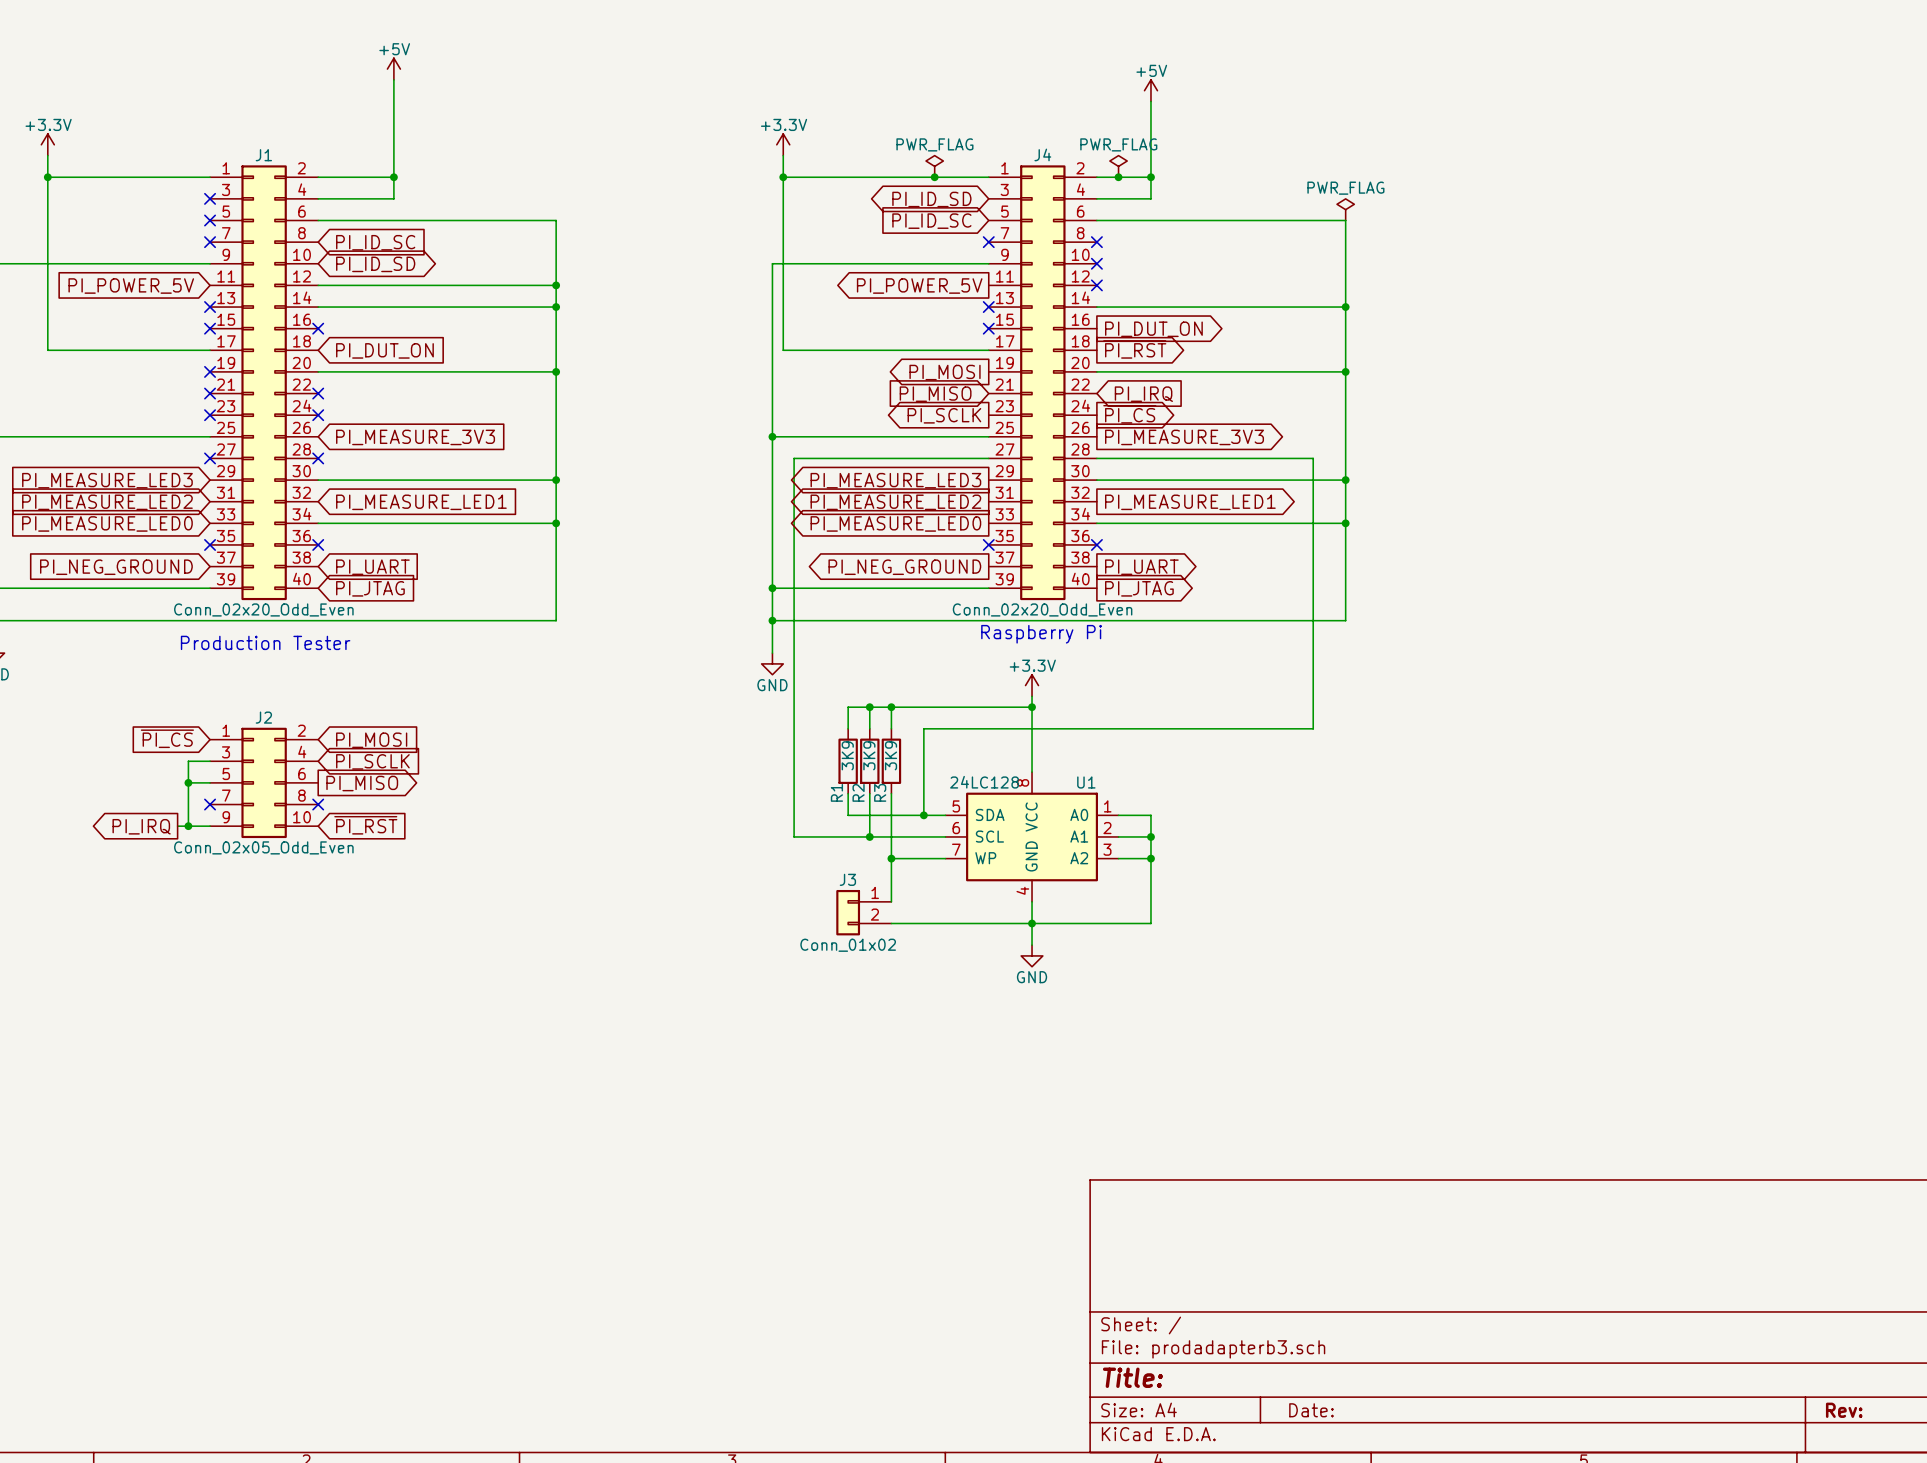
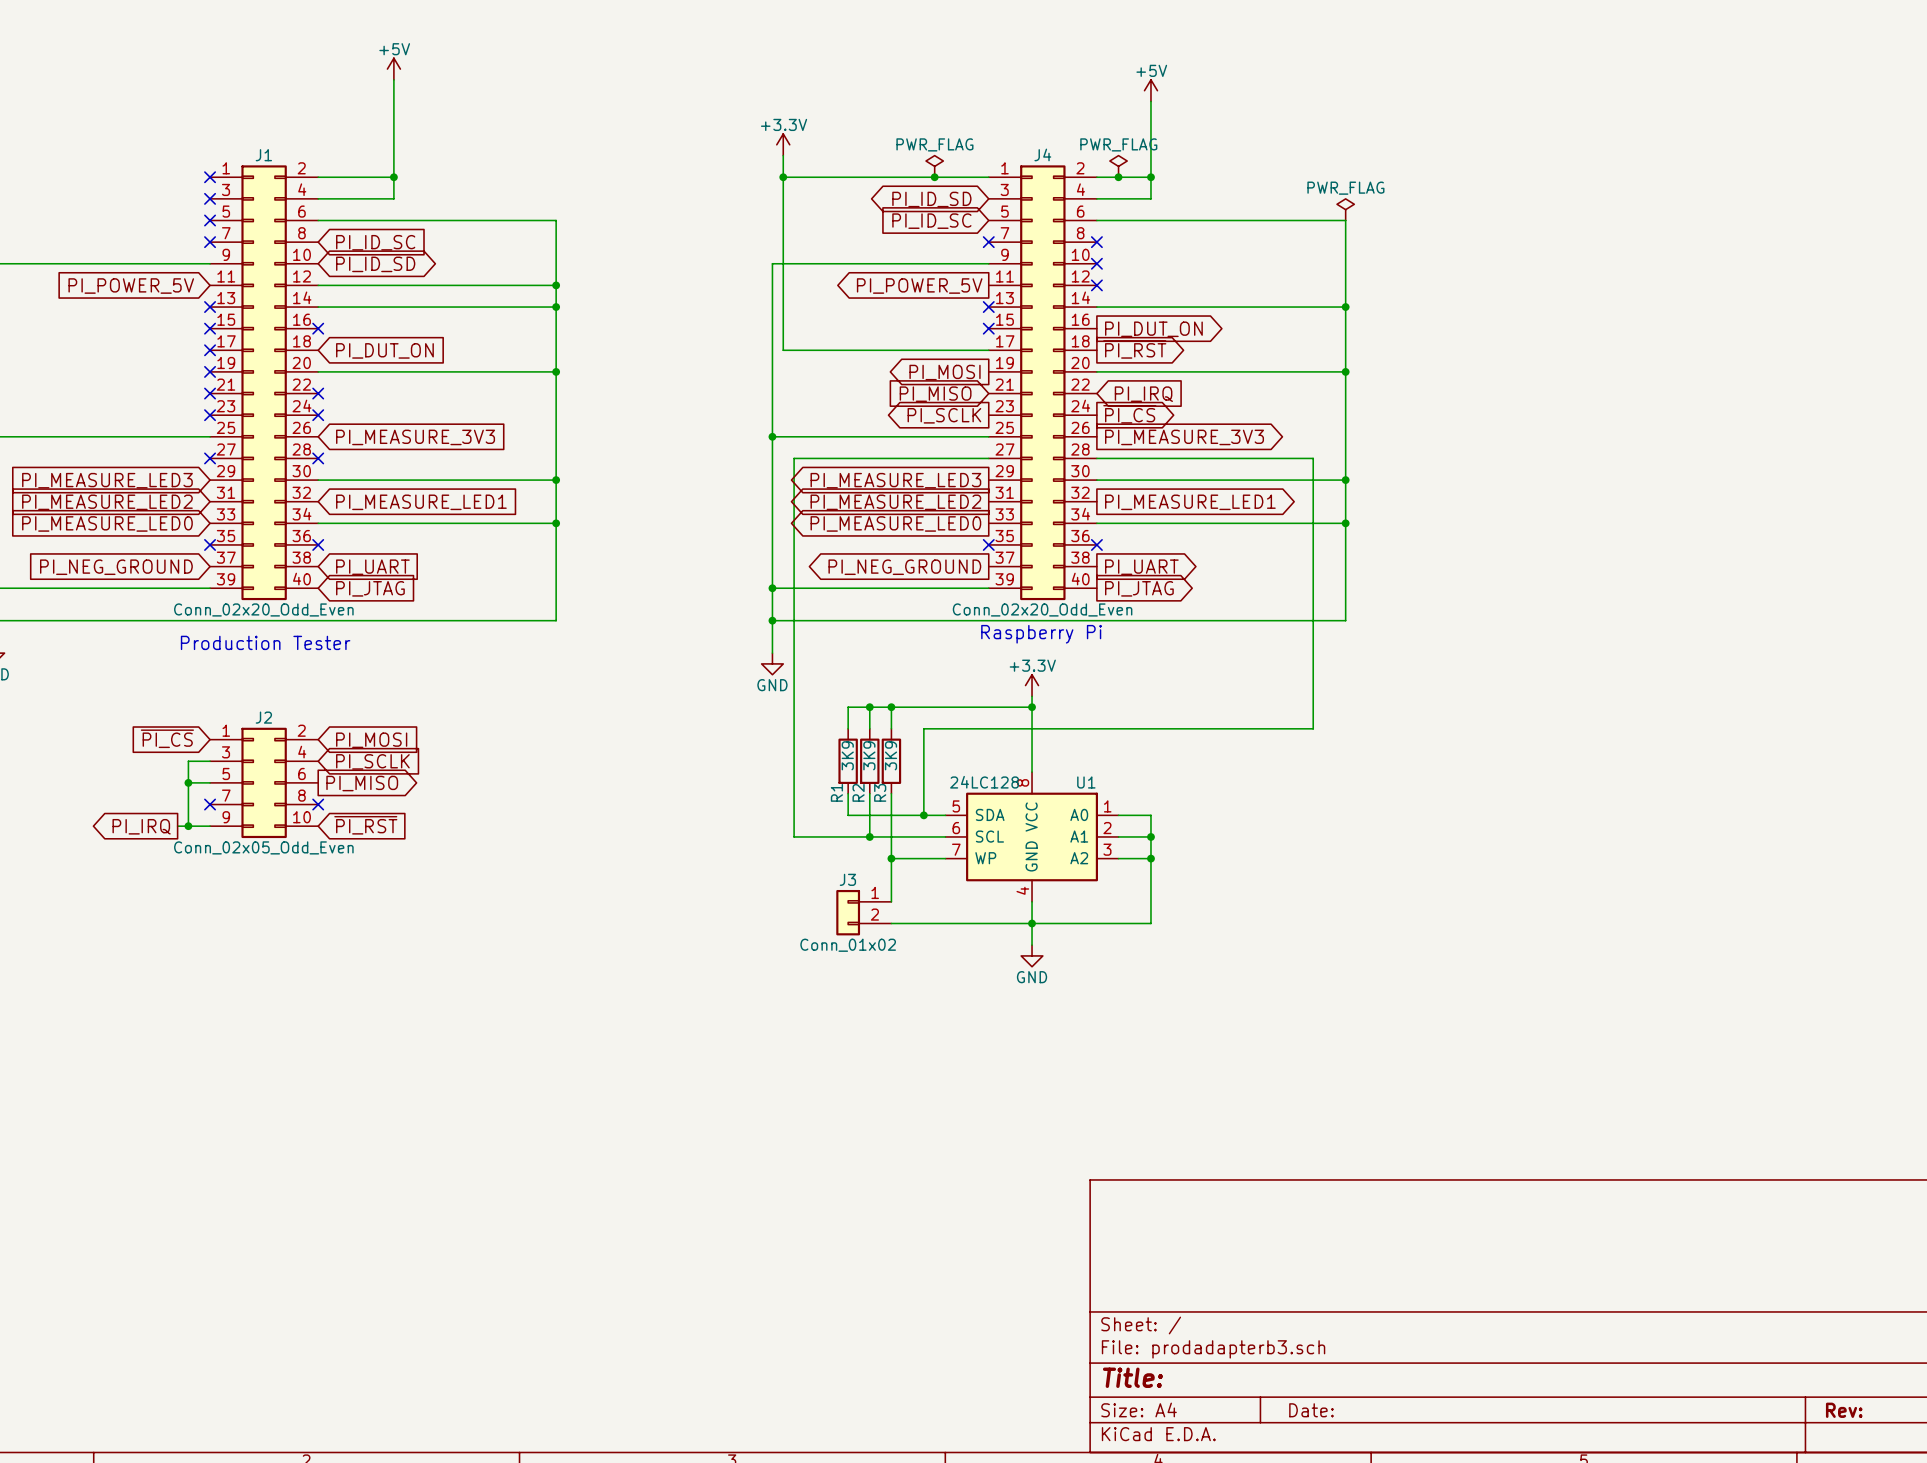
power symbol: +3.3V (47, 144) -> none
wire: (47, 155) (47, 350) (210, 350) -> none
wire: (47, 177) (210, 177) -> none
junction: (47, 177) -> none
no-connect mark: none -> (210, 177)
no-connect mark: none -> (210, 350)

